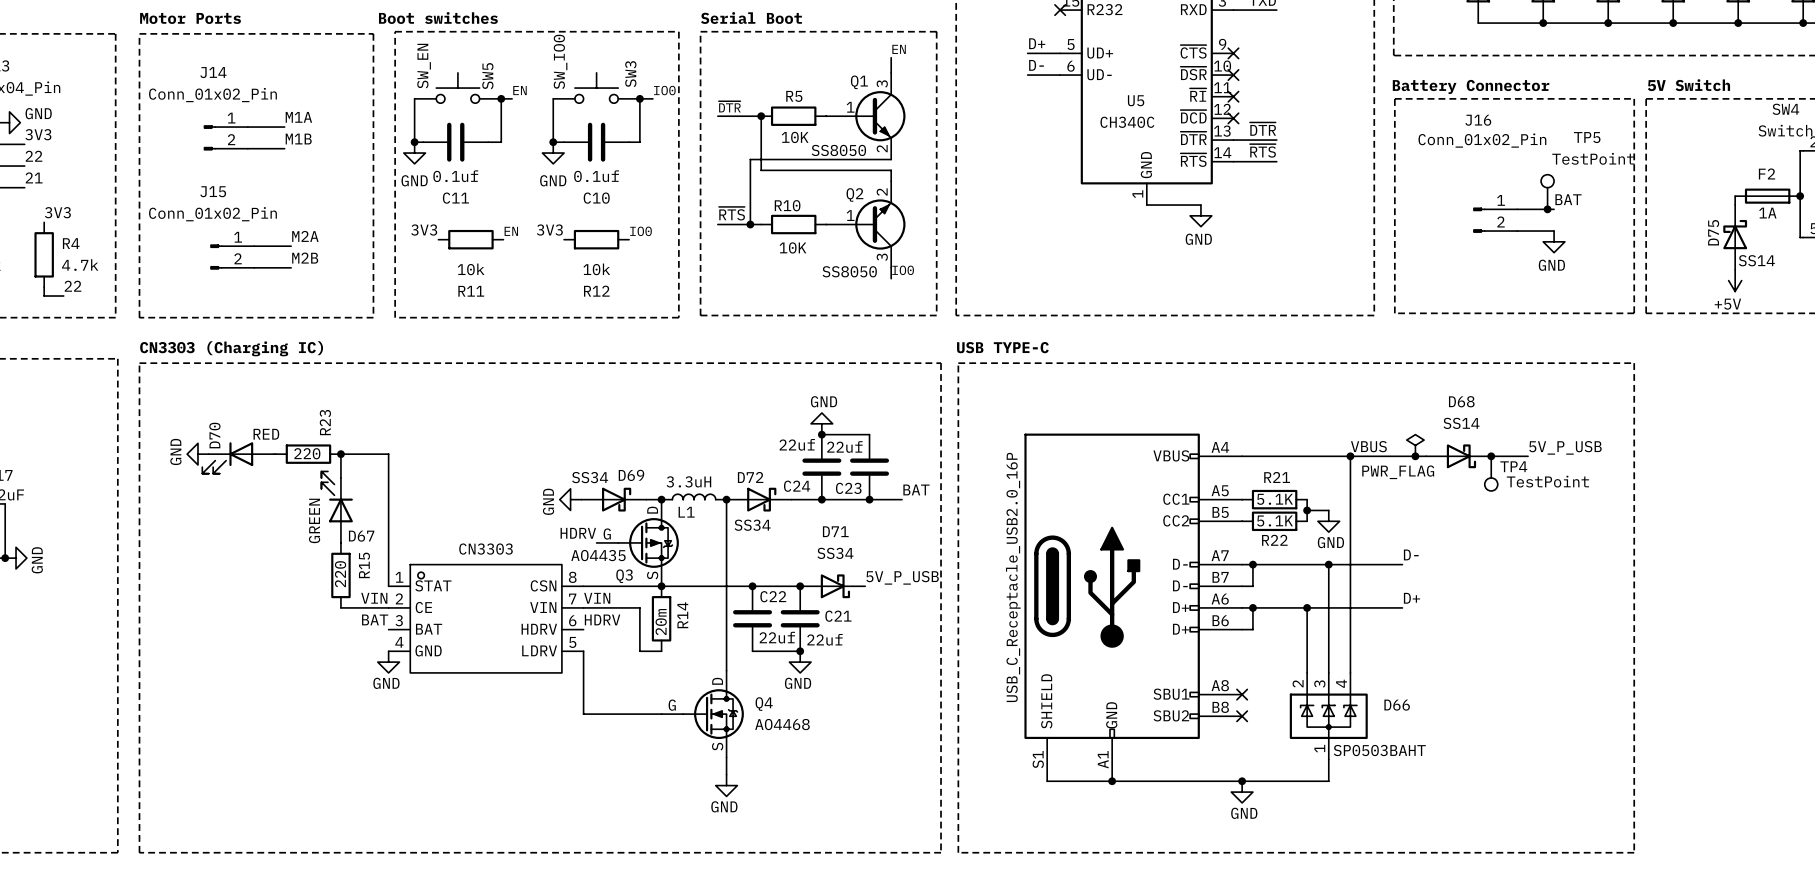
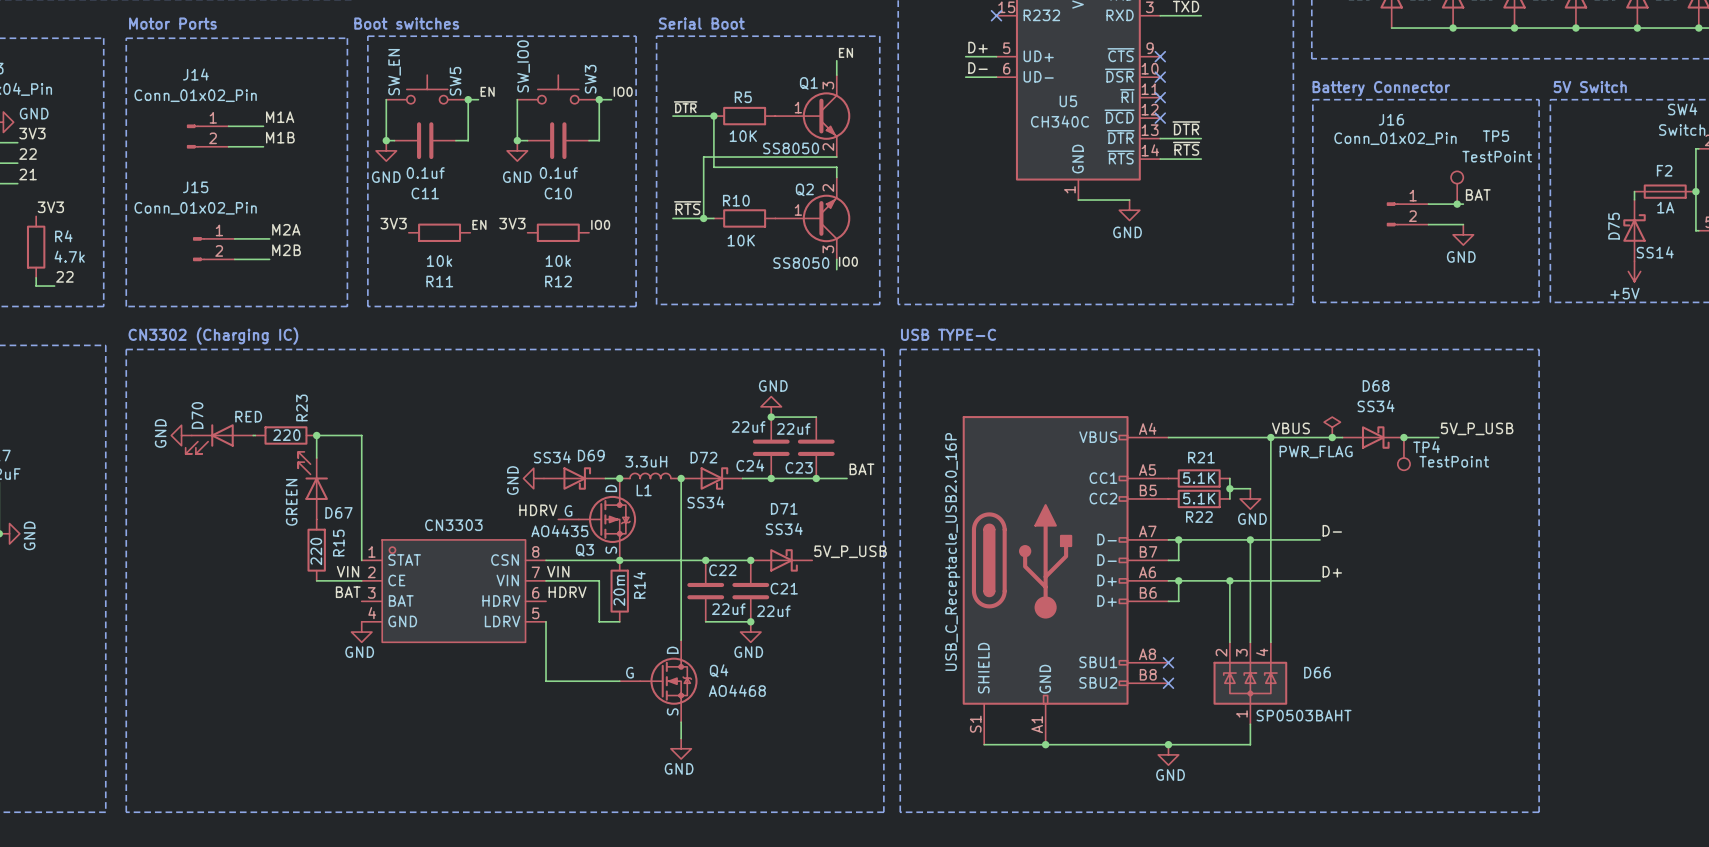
text: CN3303 (Charging IC) (231, 348) -> CN3302 (Charging IC) (213, 336)
D68 value: SS14 (1461, 423) -> SS34 (1376, 406)

